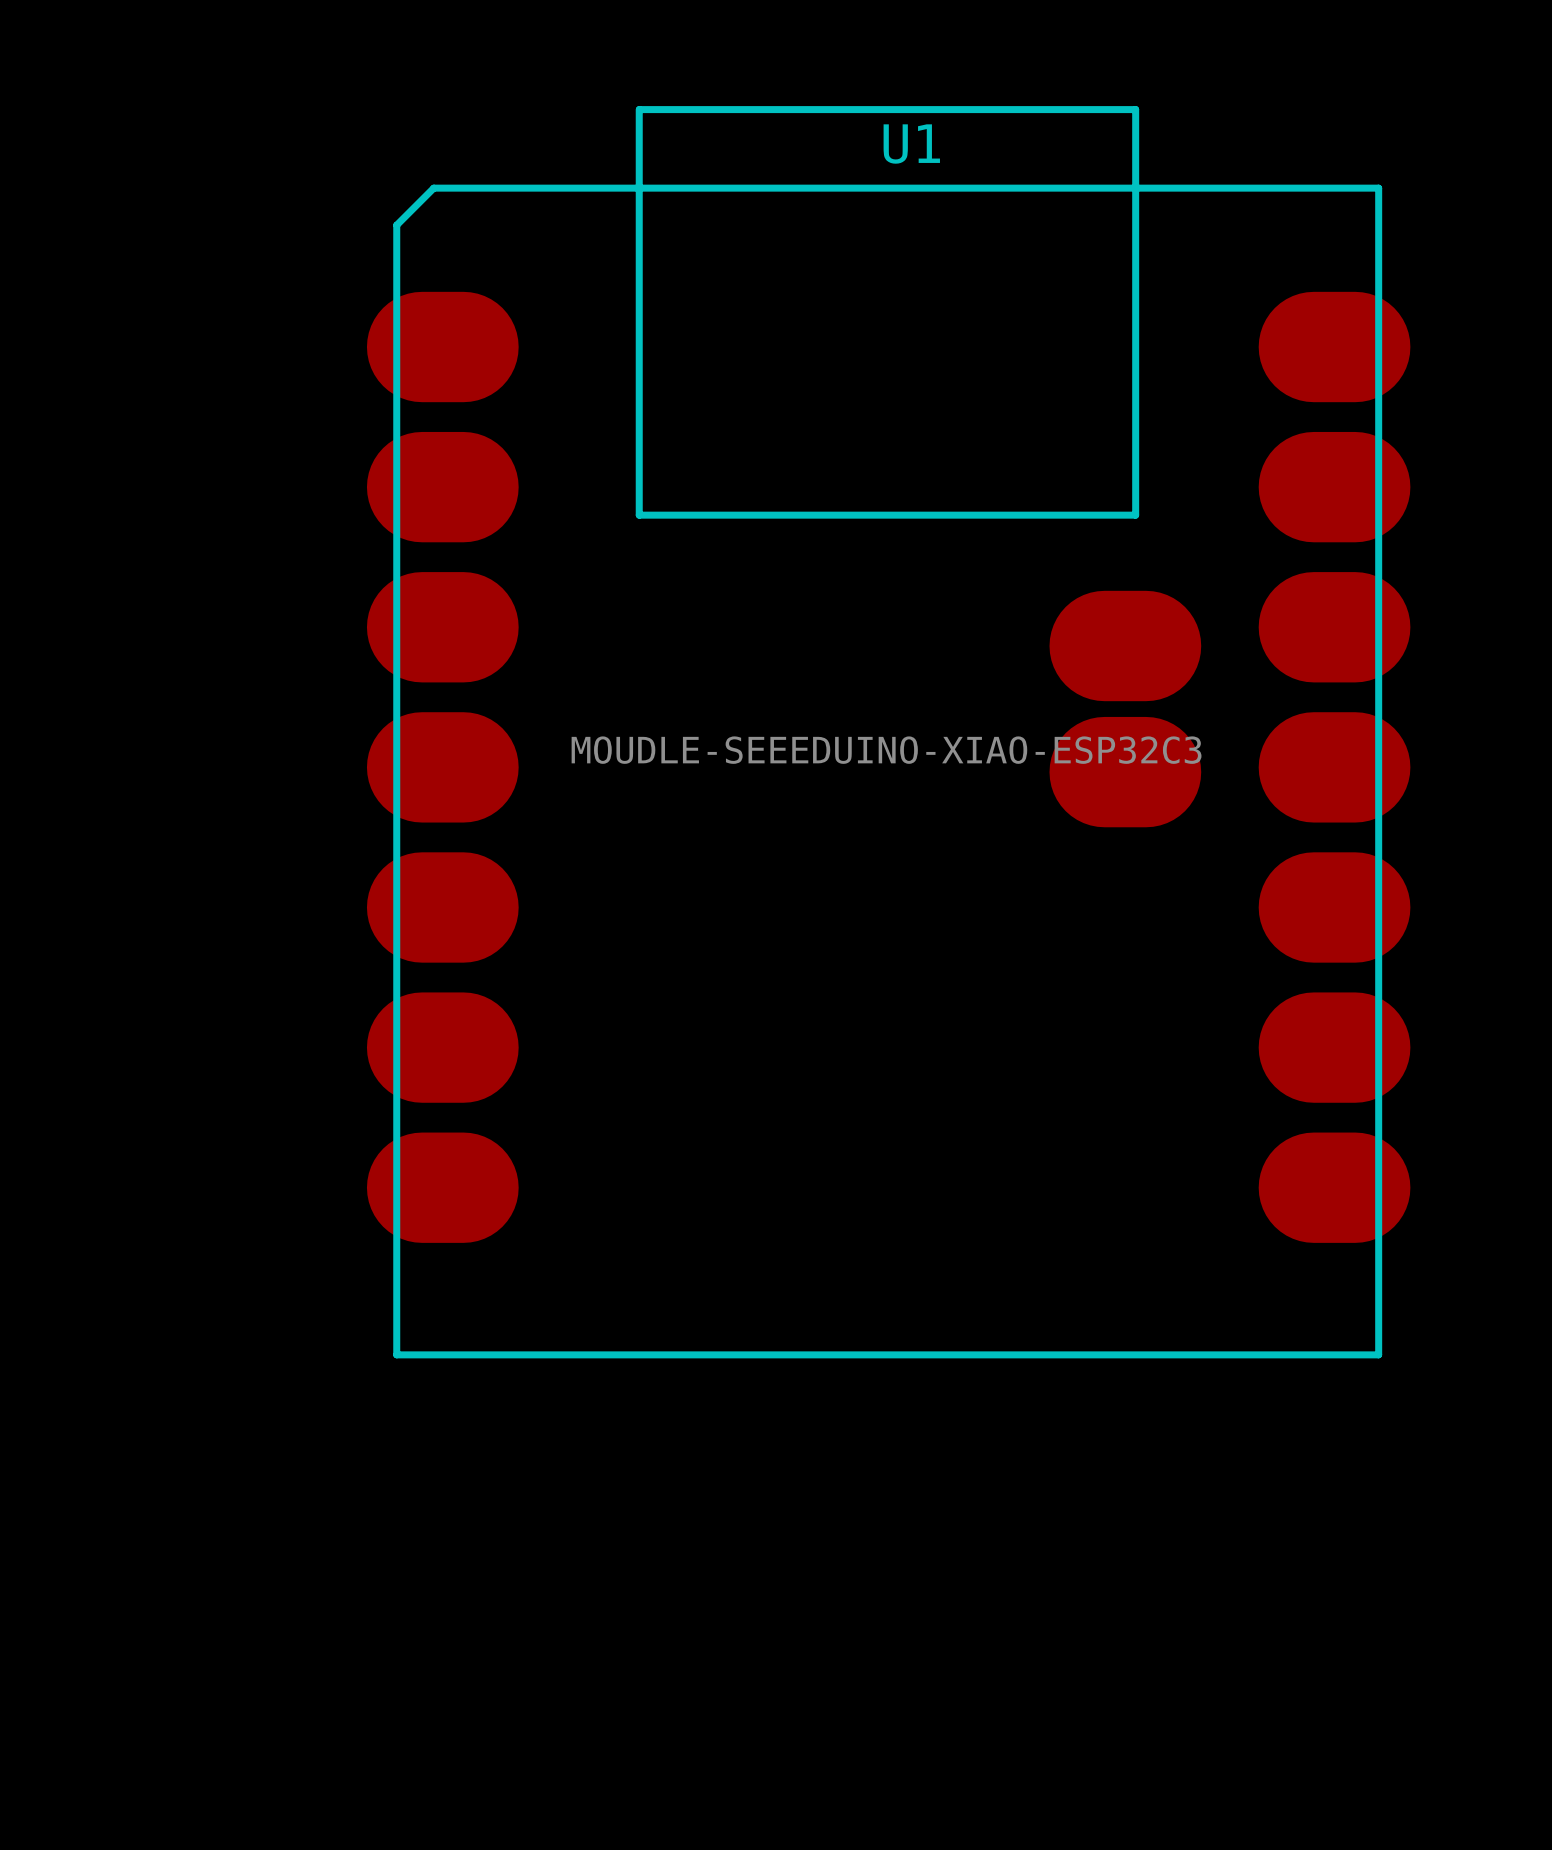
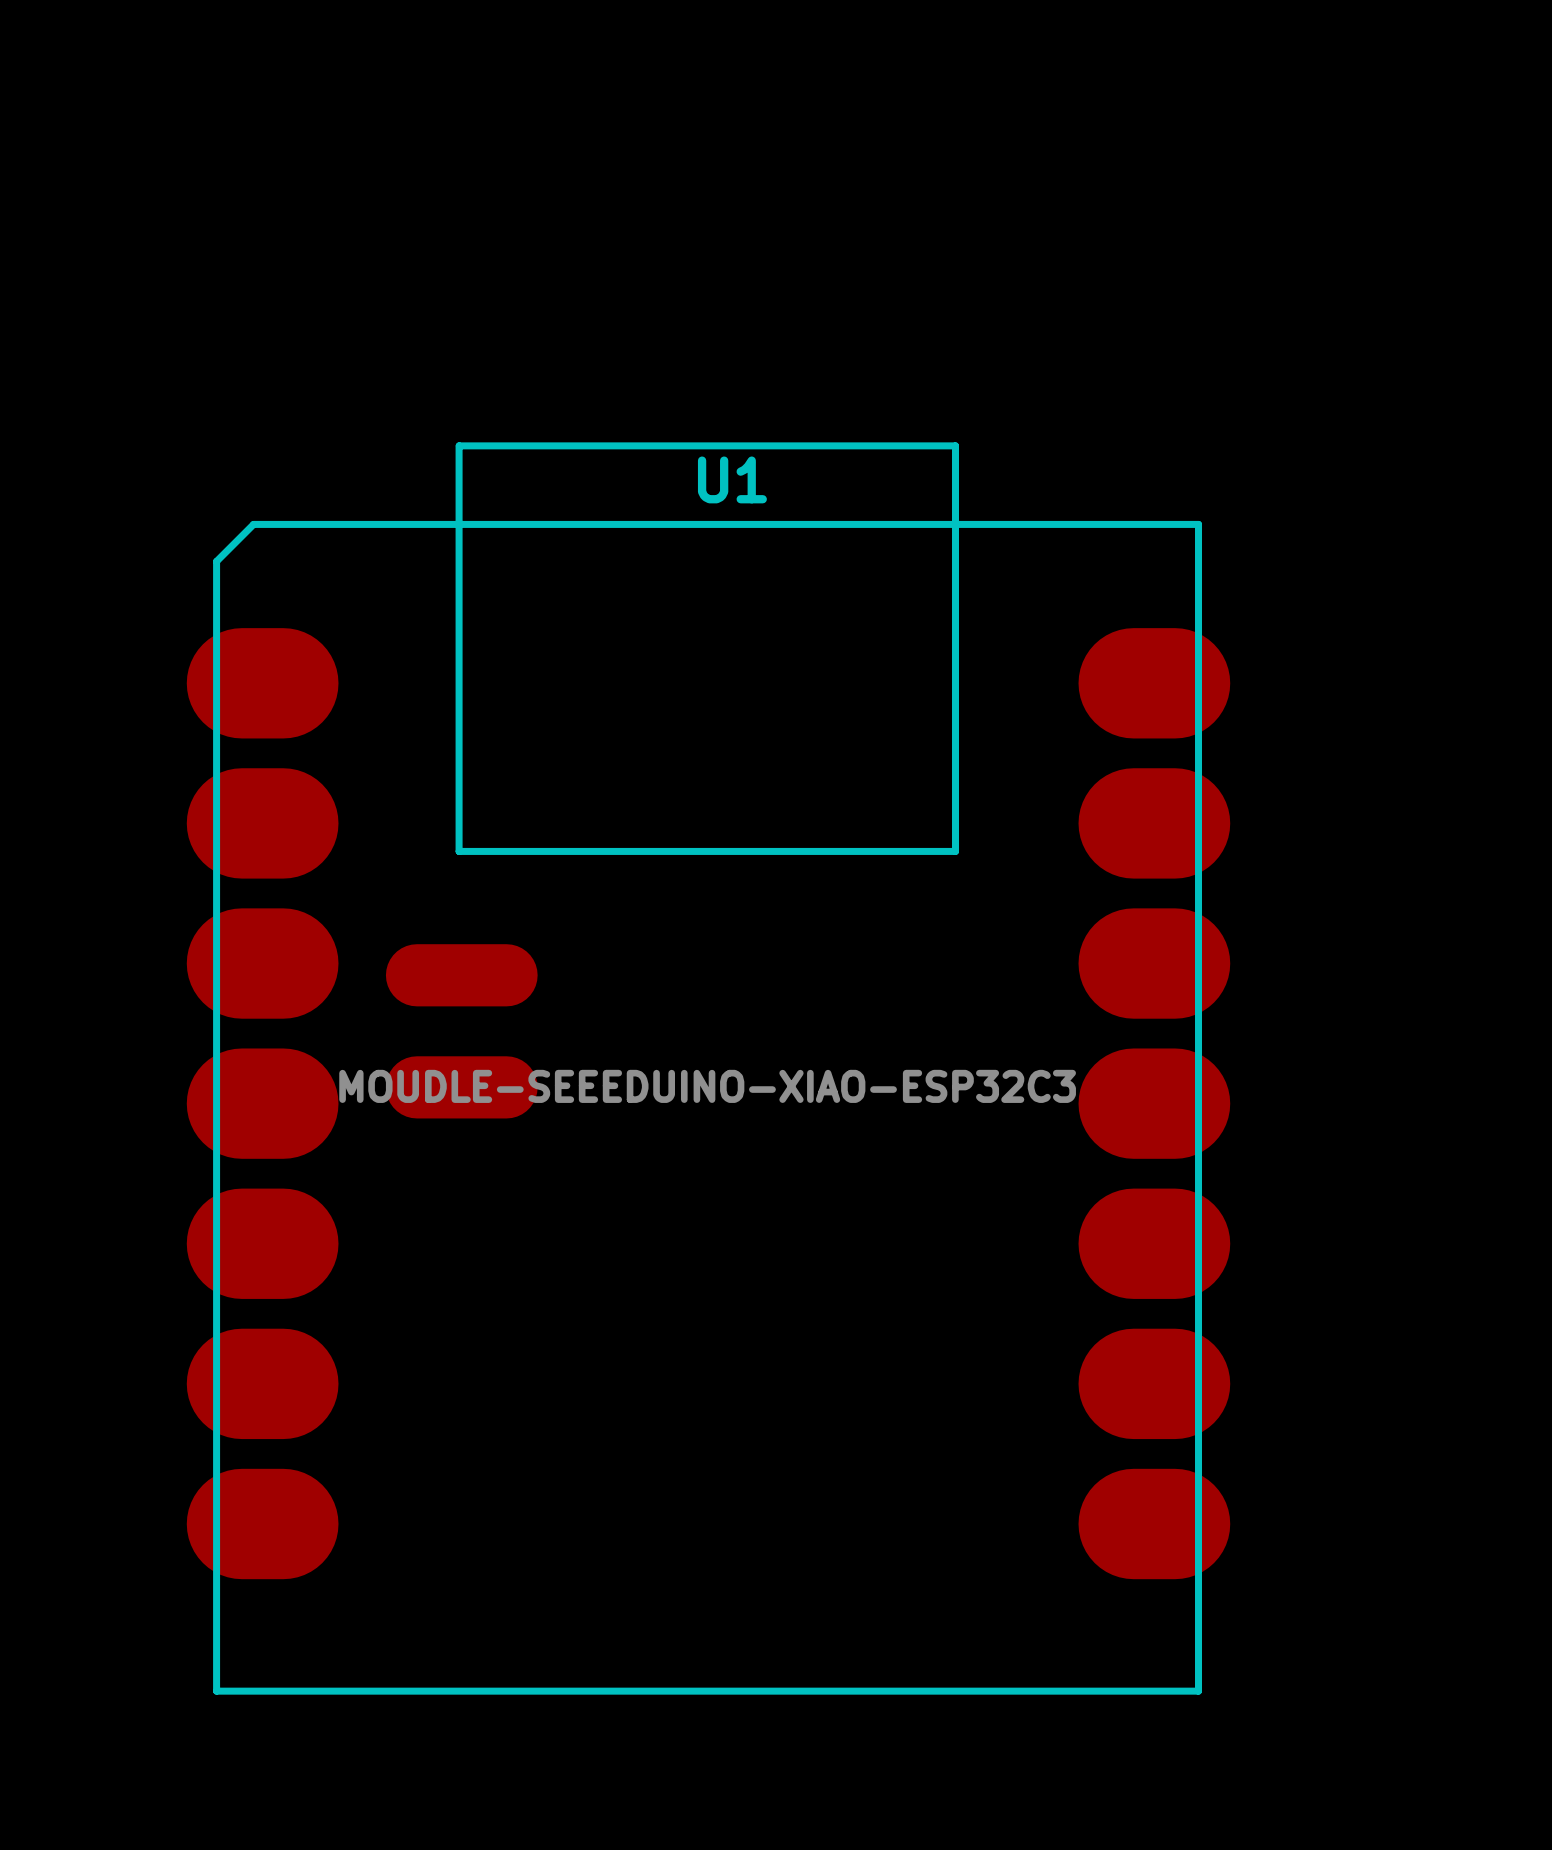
U1 footprint: [366, 106, 1411, 1359] -> [186, 442, 1231, 1695]

